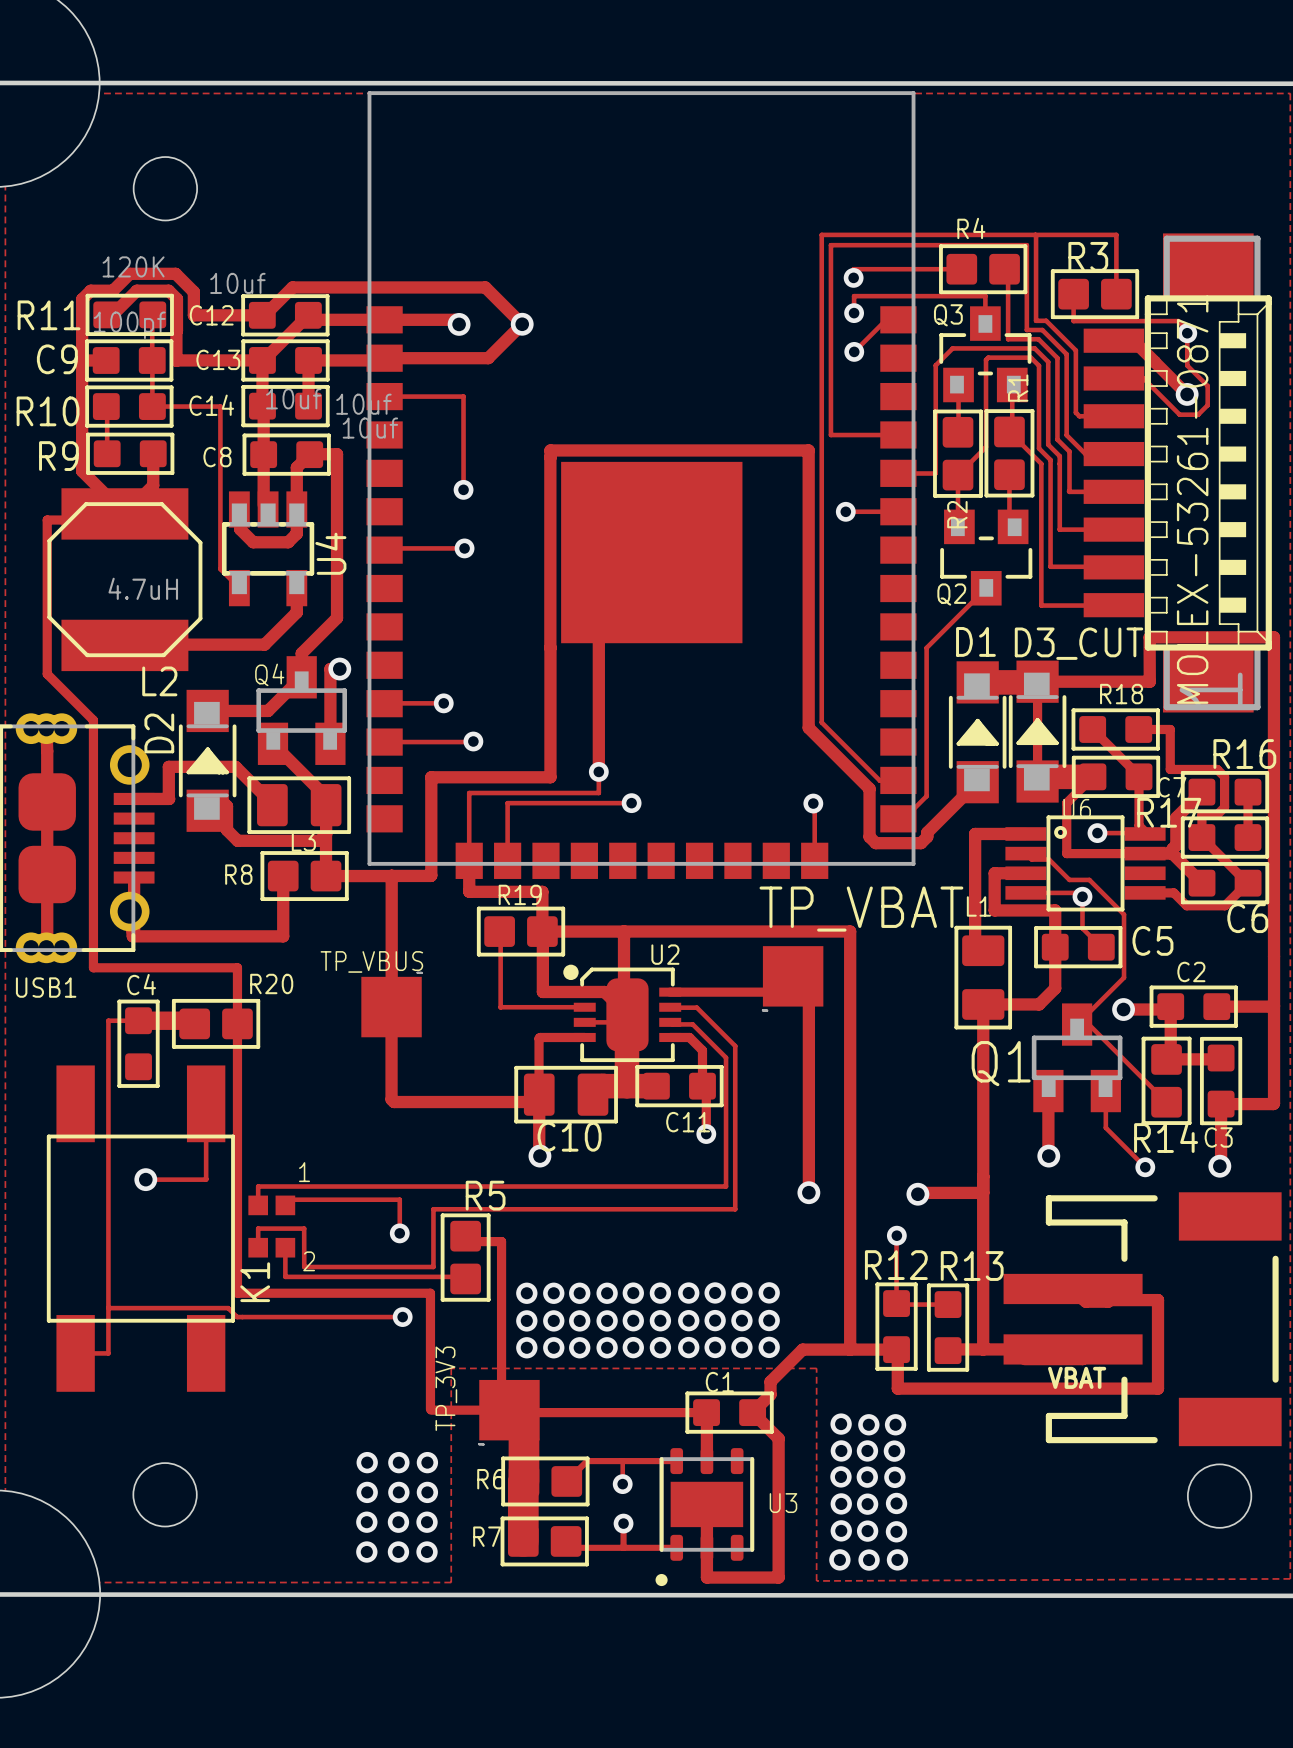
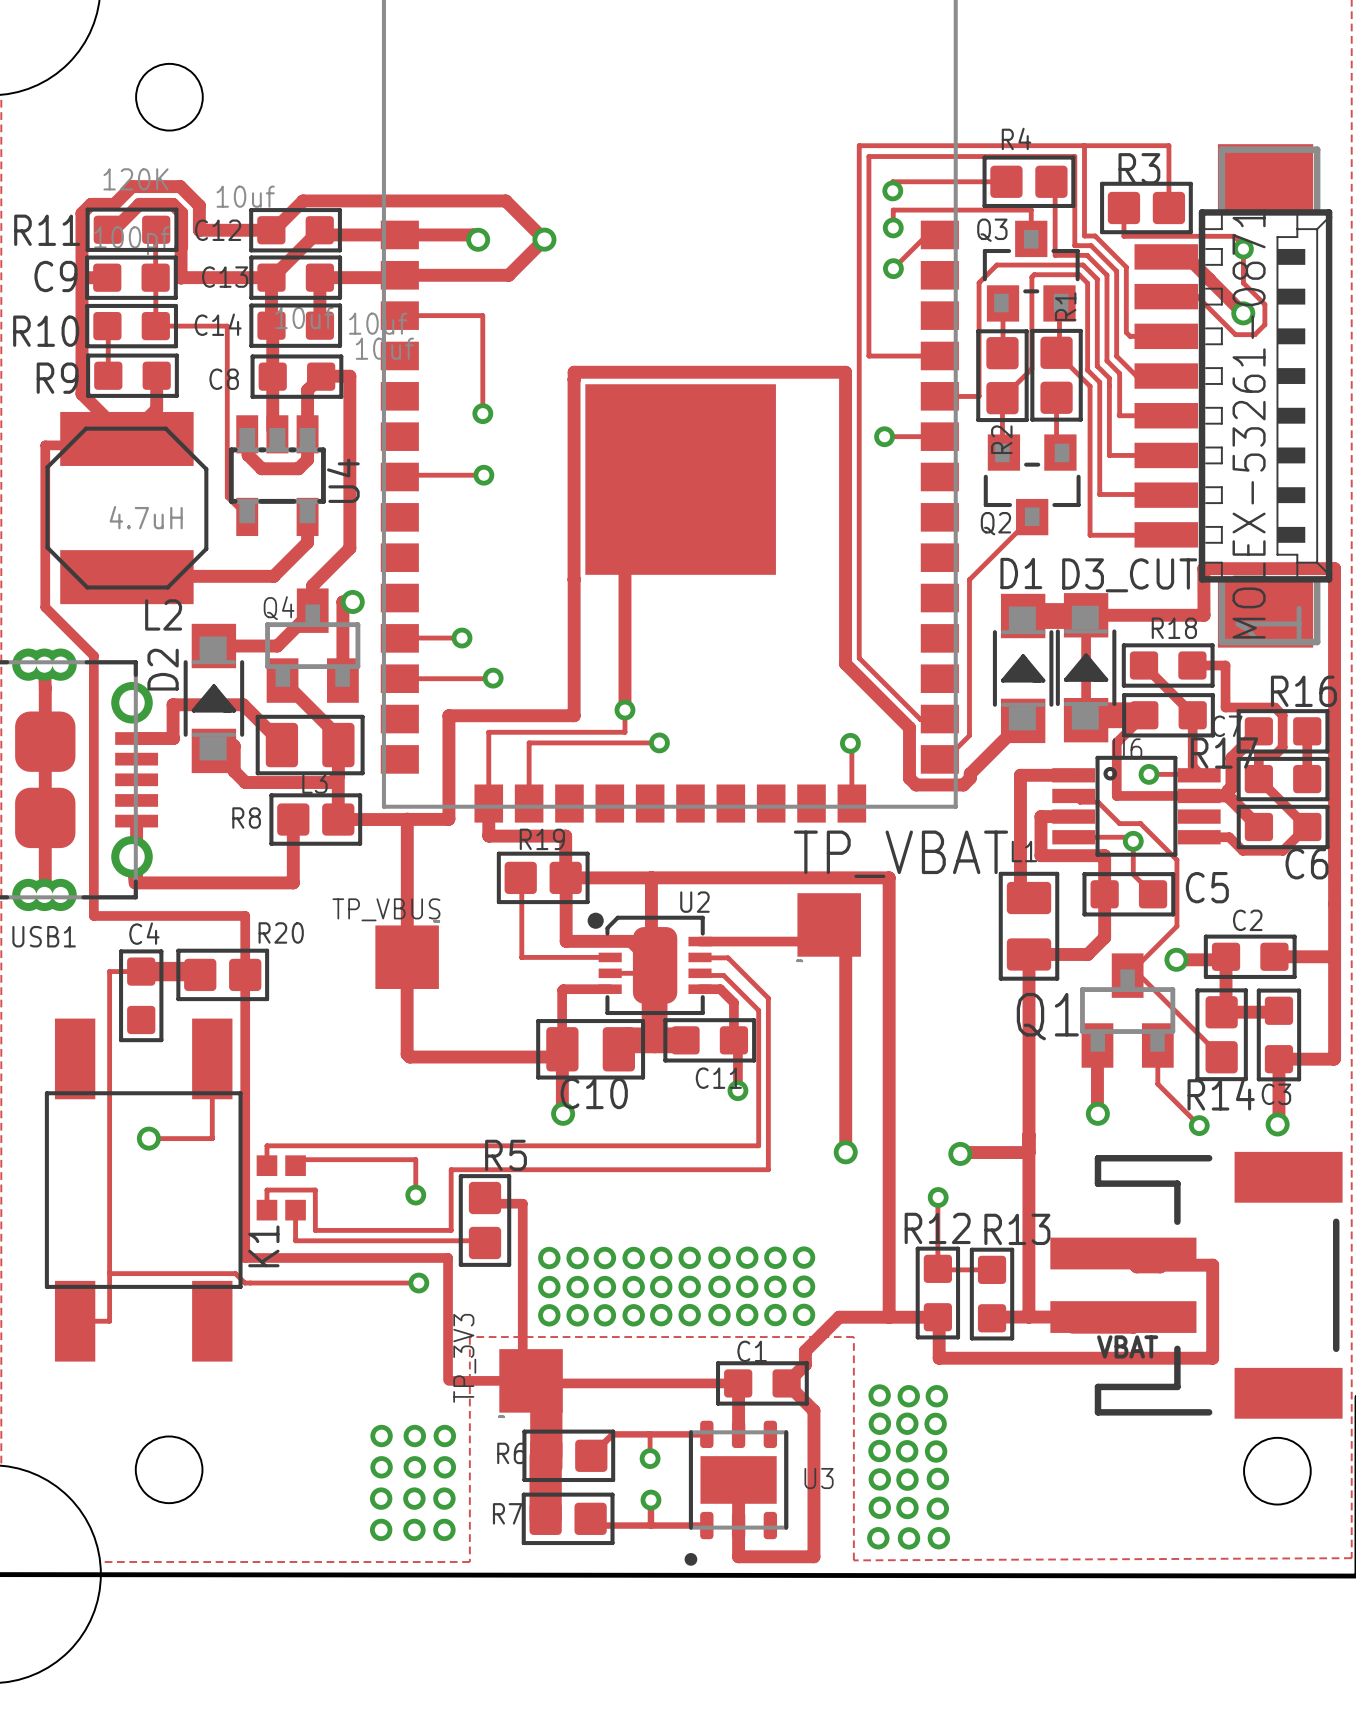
text: 1 (304, 1172) -> none
text: 2 (309, 1261) -> none

